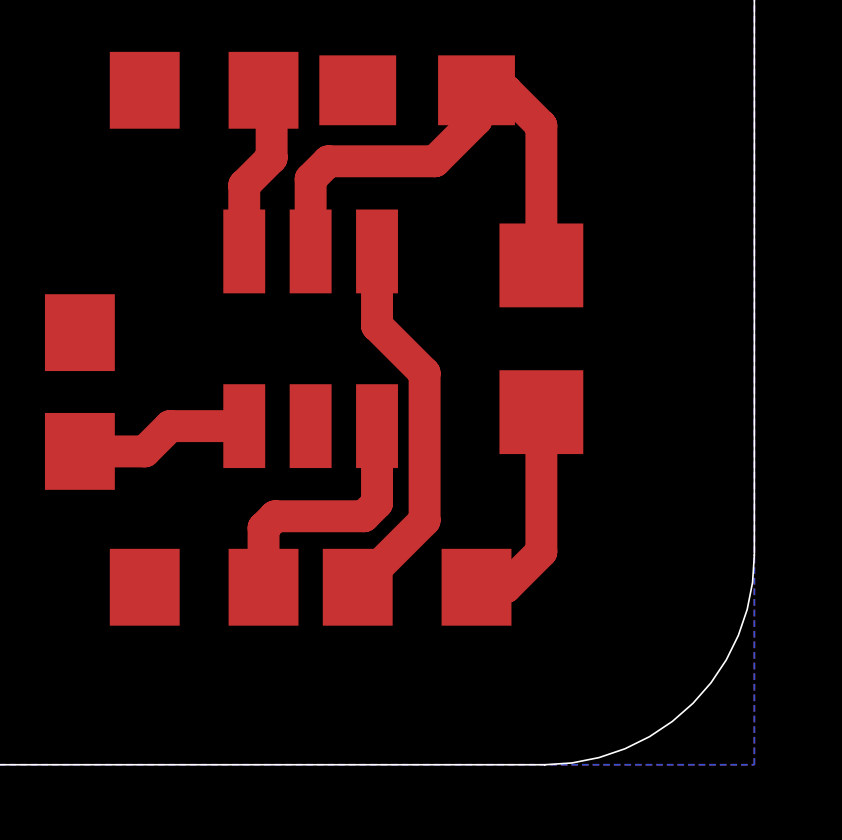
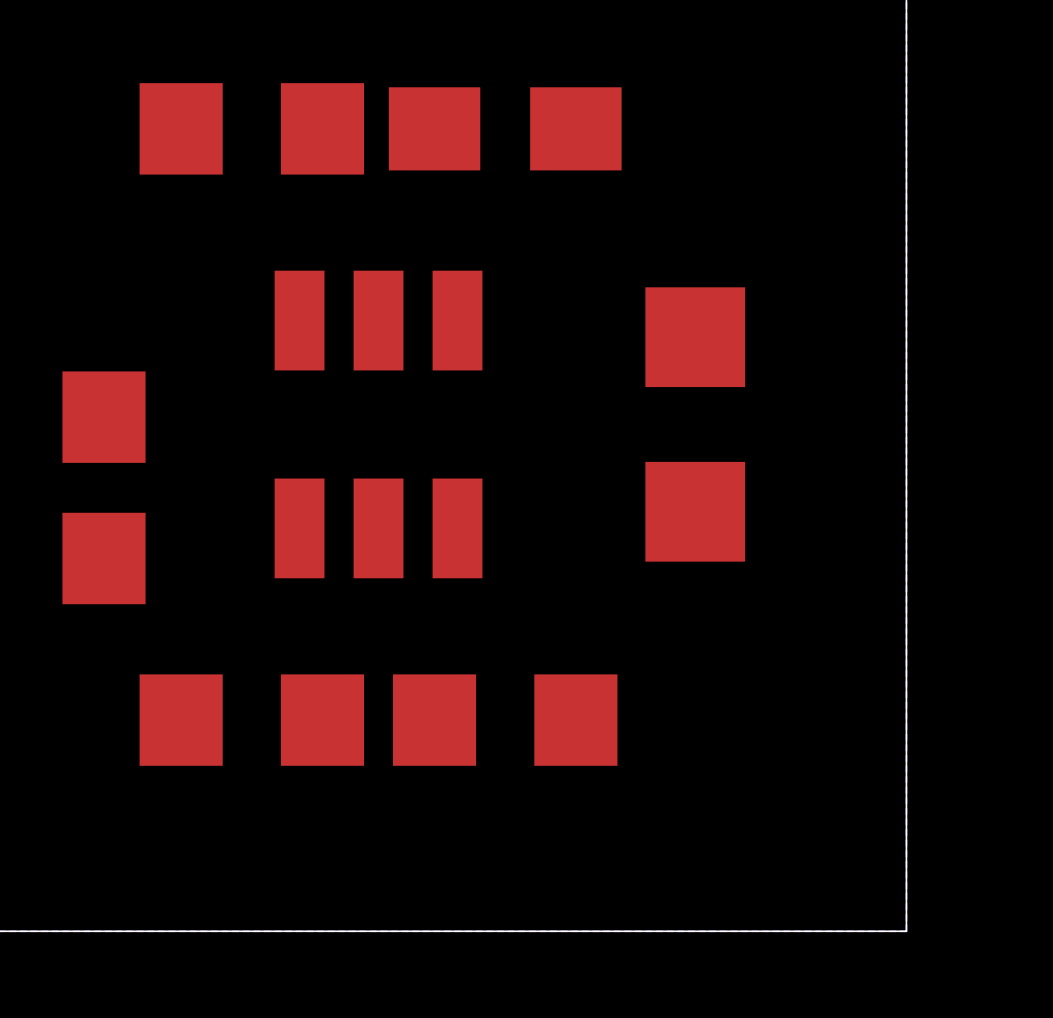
top track: (263, 90) (271, 98) (271, 157) (244, 185) (244, 251) -> none
top track: (310, 251) (310, 179) (328, 161) (434, 161) (476, 119) (476, 90) (505, 90) (541, 125) (541, 265) -> none
top track: (377, 251) (377, 325) (424, 373) (424, 520) (357, 587) -> none
part position: (541, 338) -> (695, 424)
top track: (541, 412) (541, 551) (505, 587) (476, 587) -> none
top track: (244, 426) (170, 426) (144, 451) (79, 451) -> none
top track: (377, 426) (377, 503) (363, 516) (275, 516) (263, 527) (263, 587) -> none
board edge: (754, 555) (752, 582) (747, 609) (738, 635) (726, 659) (711, 682) (692, 703) (672, 721) (649, 736) (624, 748) (598, 757) (572, 762) (544, 764) -> (906, 681) (906, 931) (657, 931)

